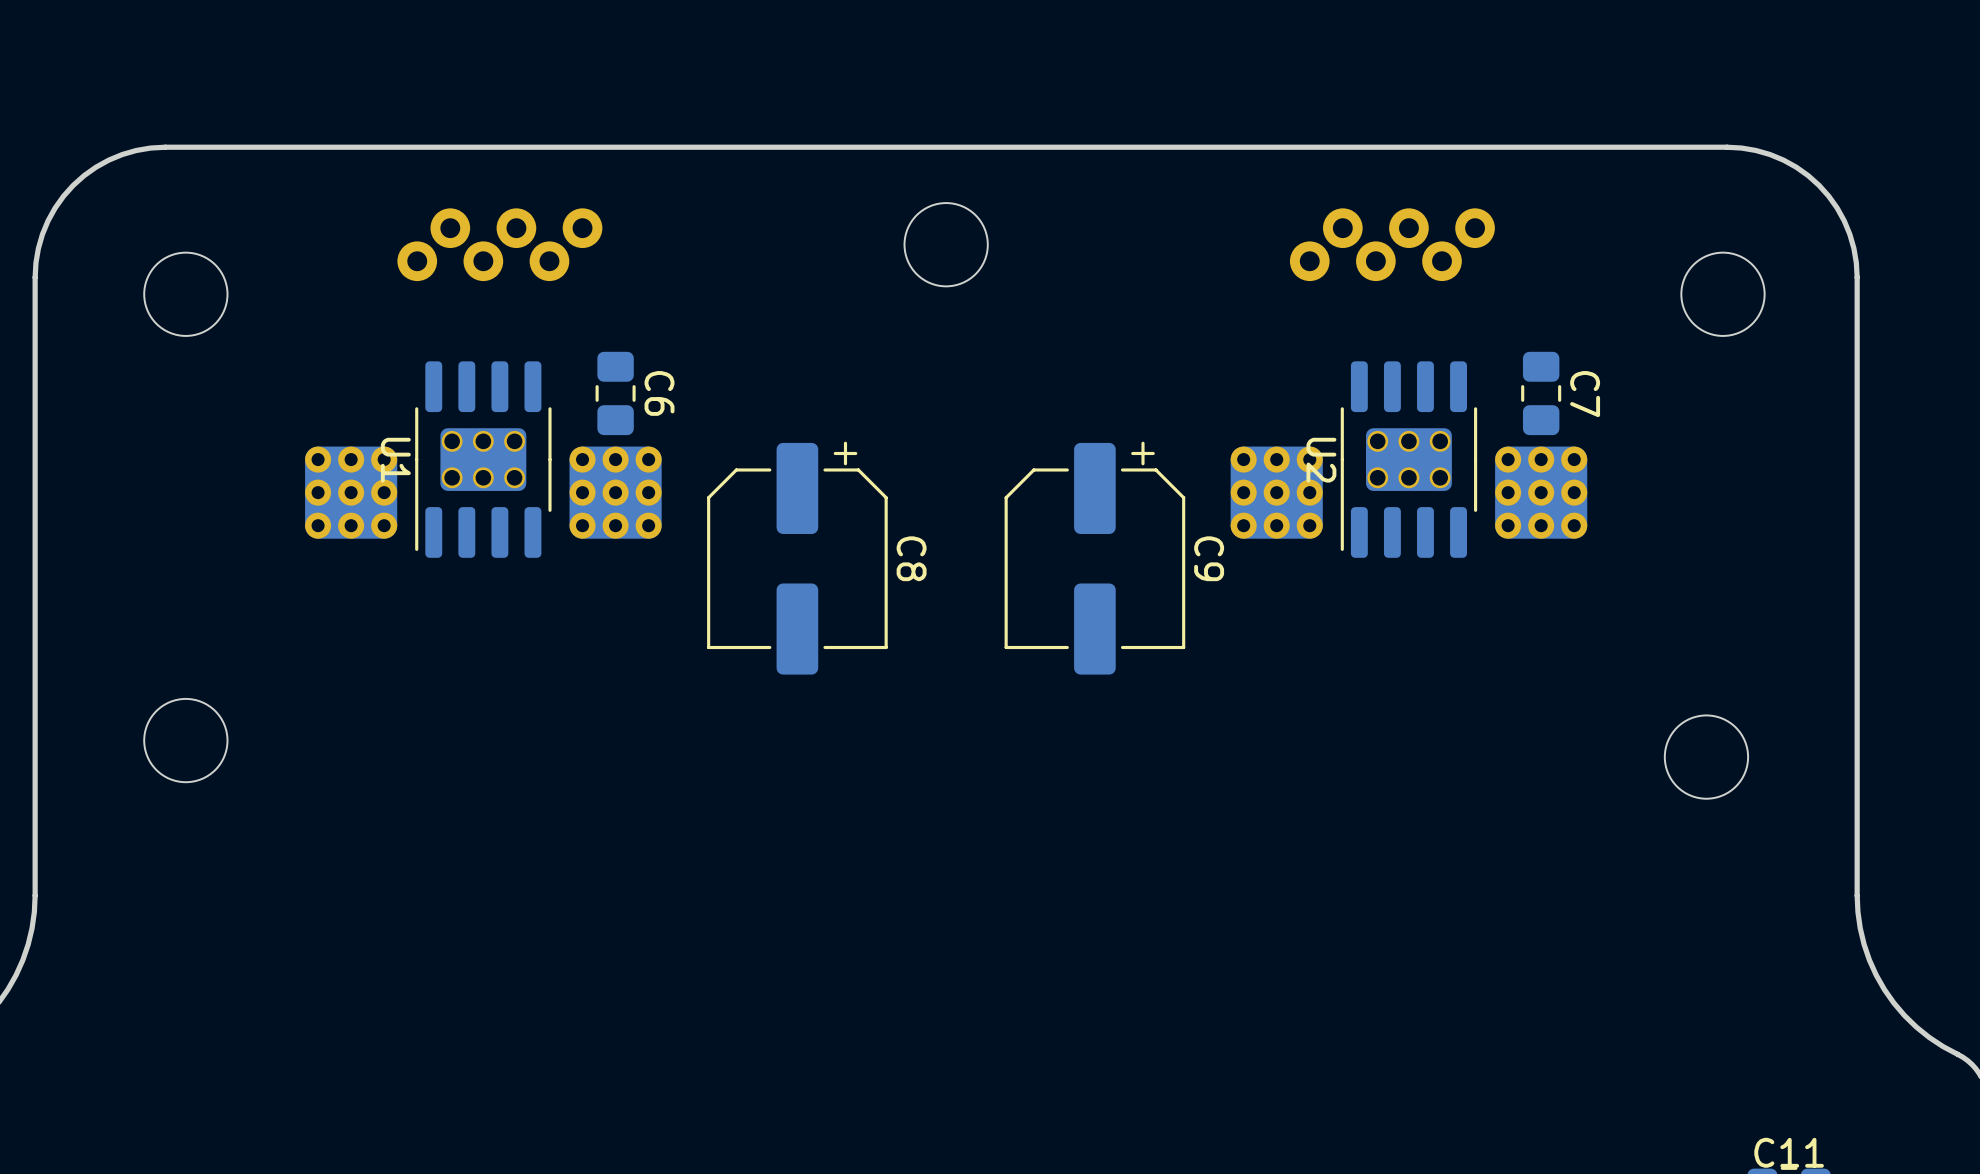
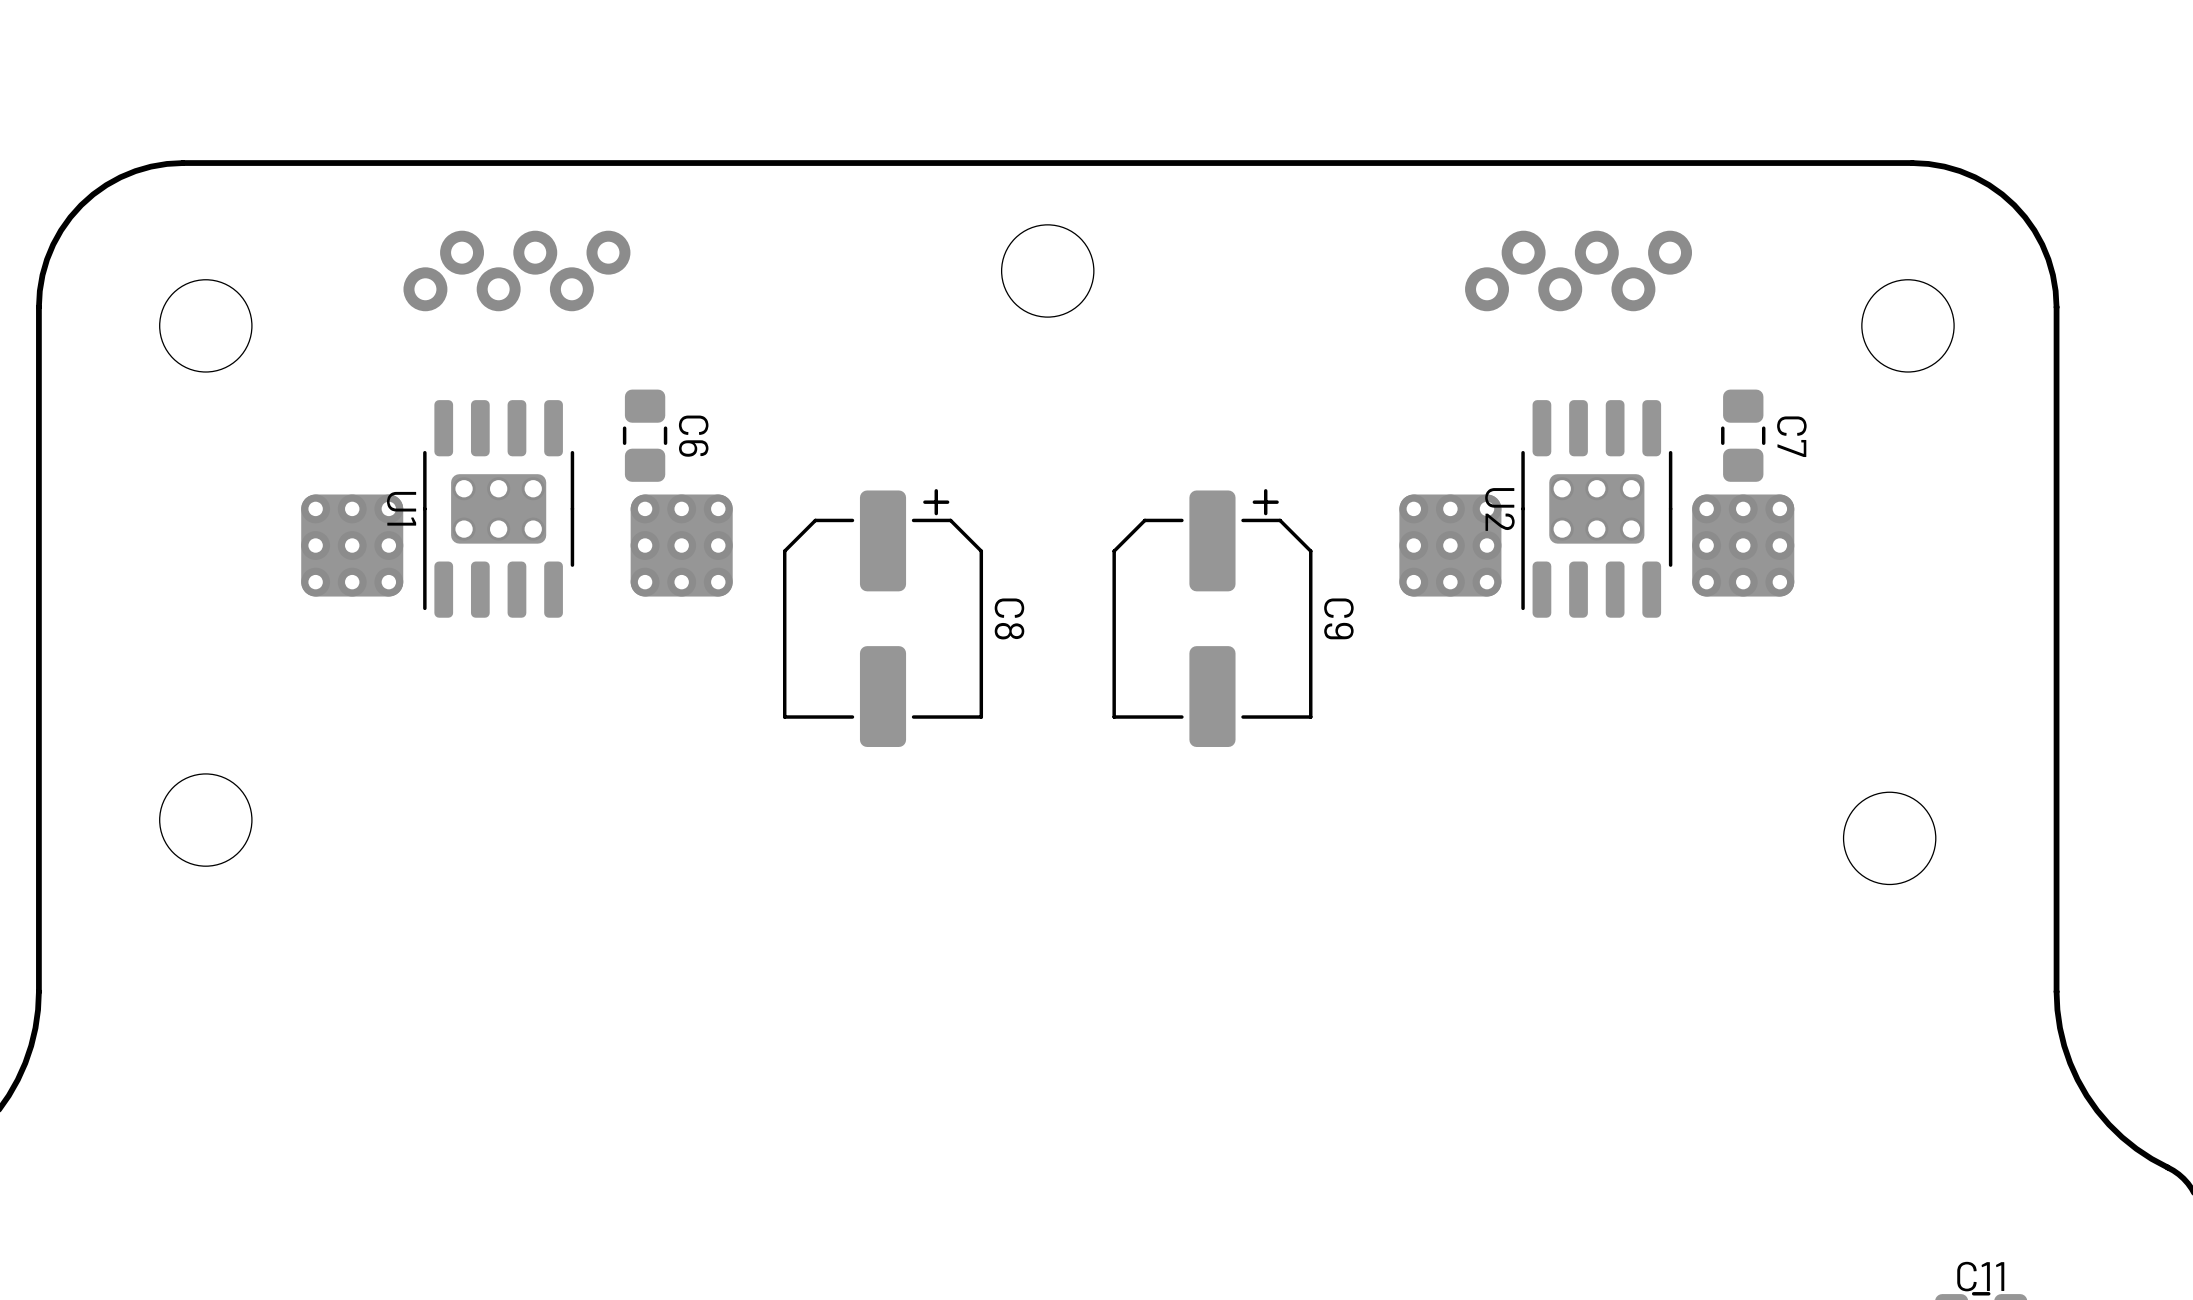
part position: (499, 244) -> (516, 270)
part position: (1392, 244) -> (1578, 270)
C6 position: (615, 393) -> (645, 435)
C7 position: (1541, 393) -> (1743, 435)
U1 position: (483, 459) -> (498, 508)
U2 position: (1408, 459) -> (1596, 508)
part position: (351, 492) -> (352, 545)
part position: (1276, 492) -> (1450, 545)
part position: (1541, 492) -> (1743, 545)

